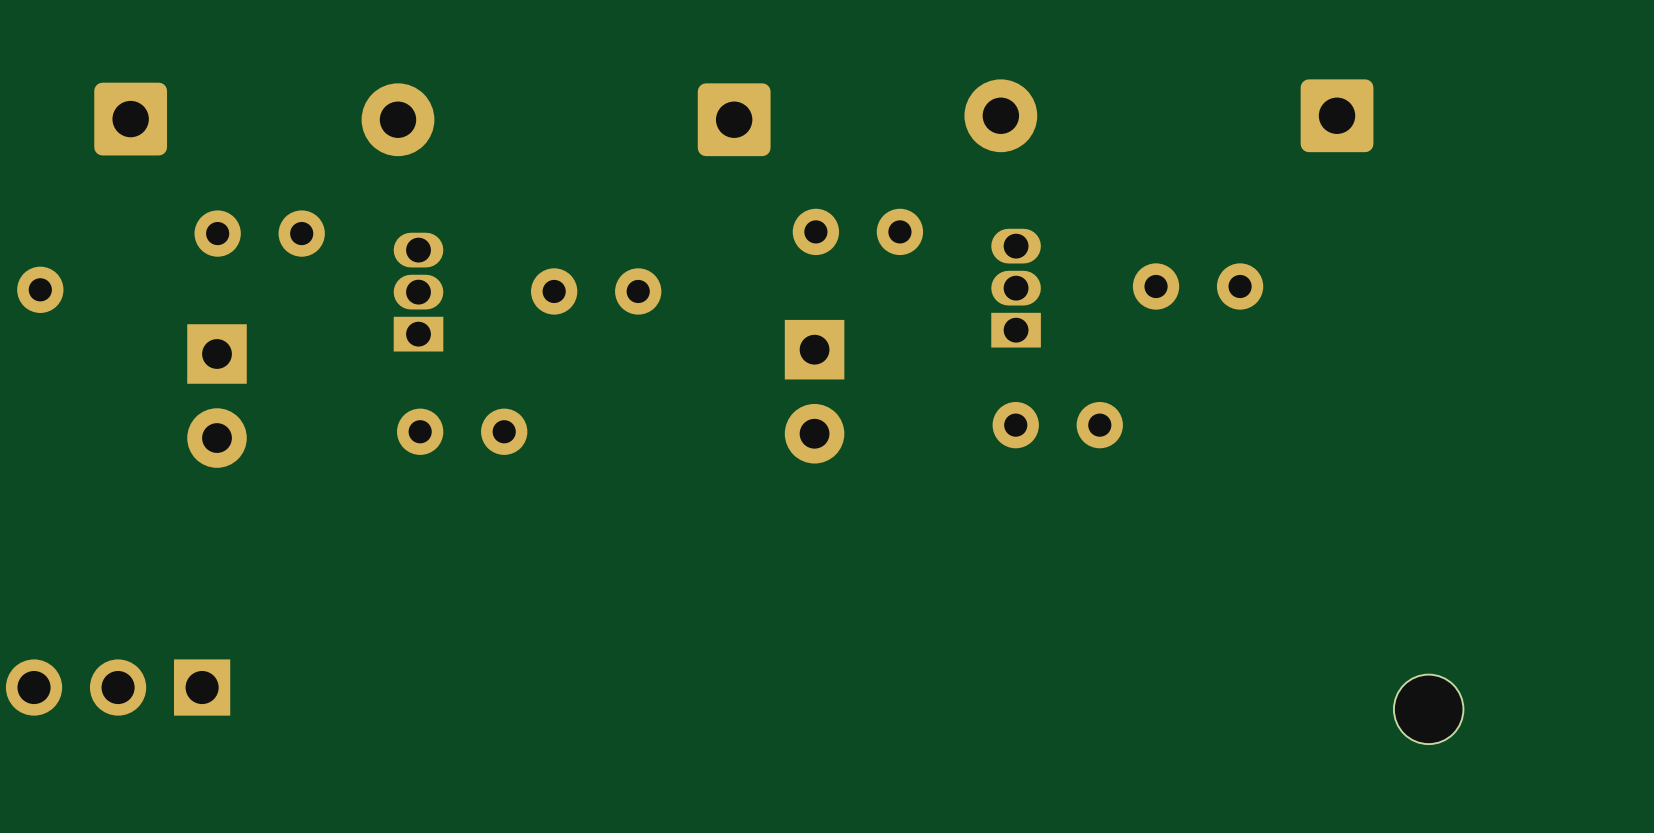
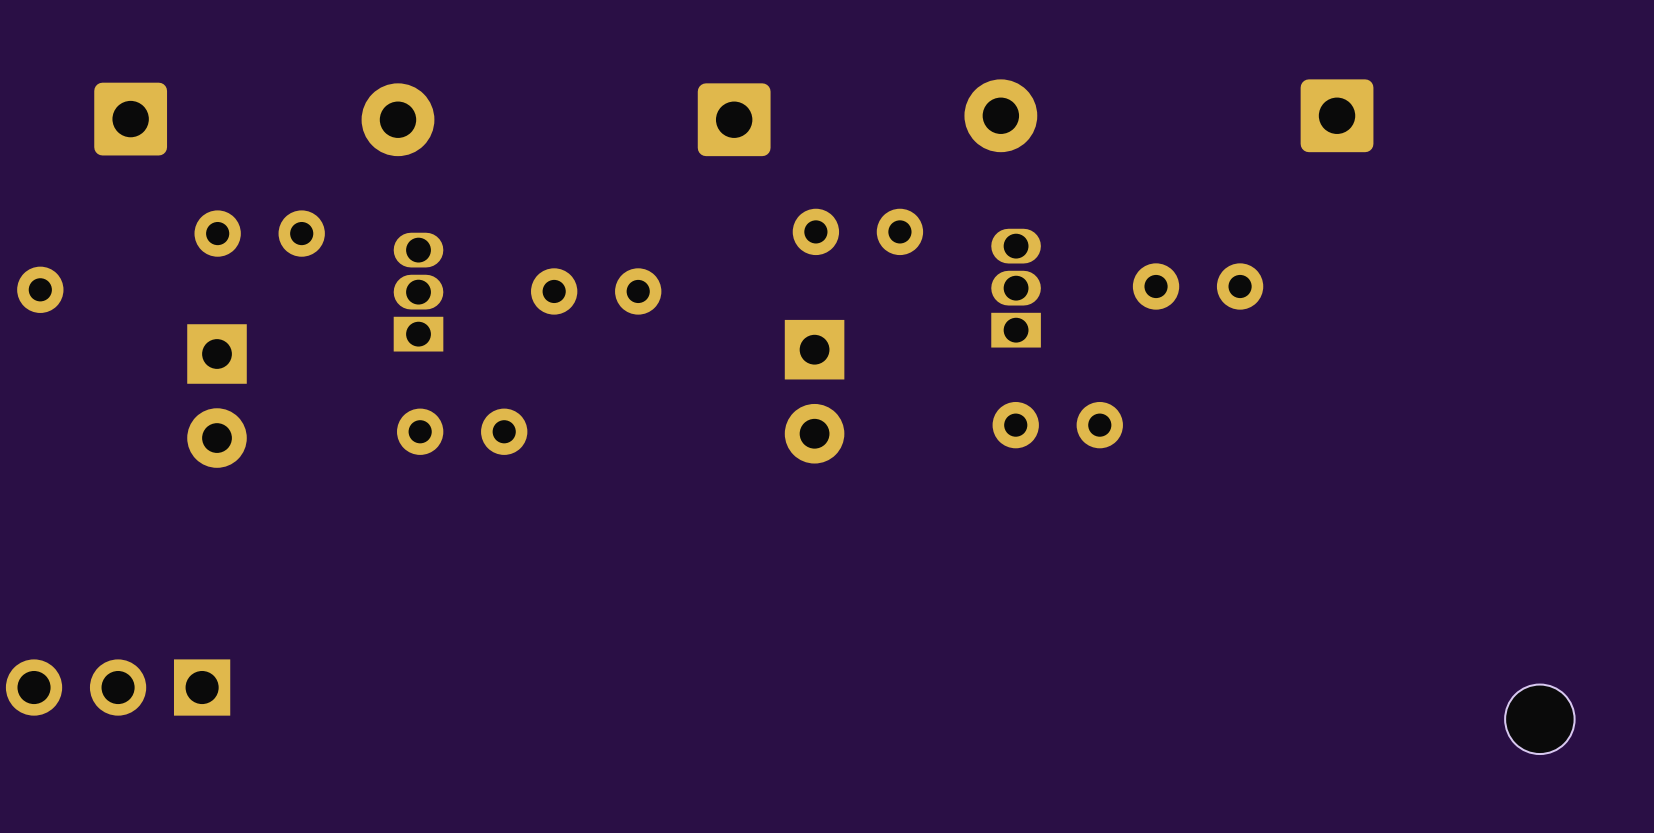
part position: (1428, 709) -> (1539, 719)

